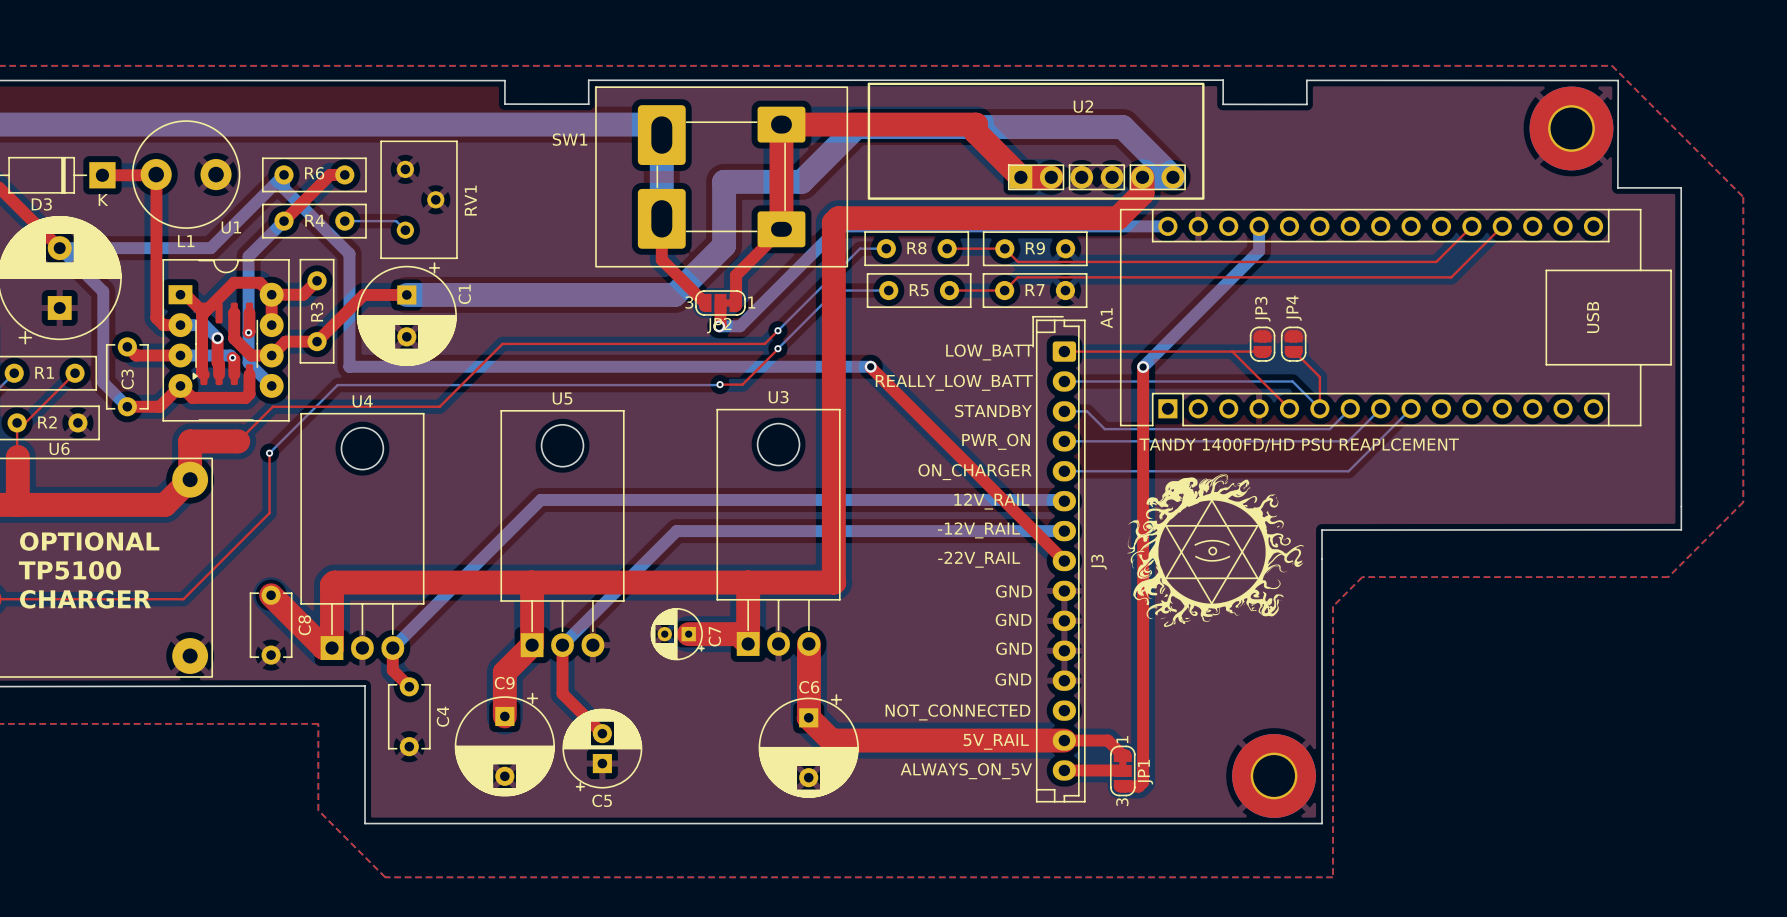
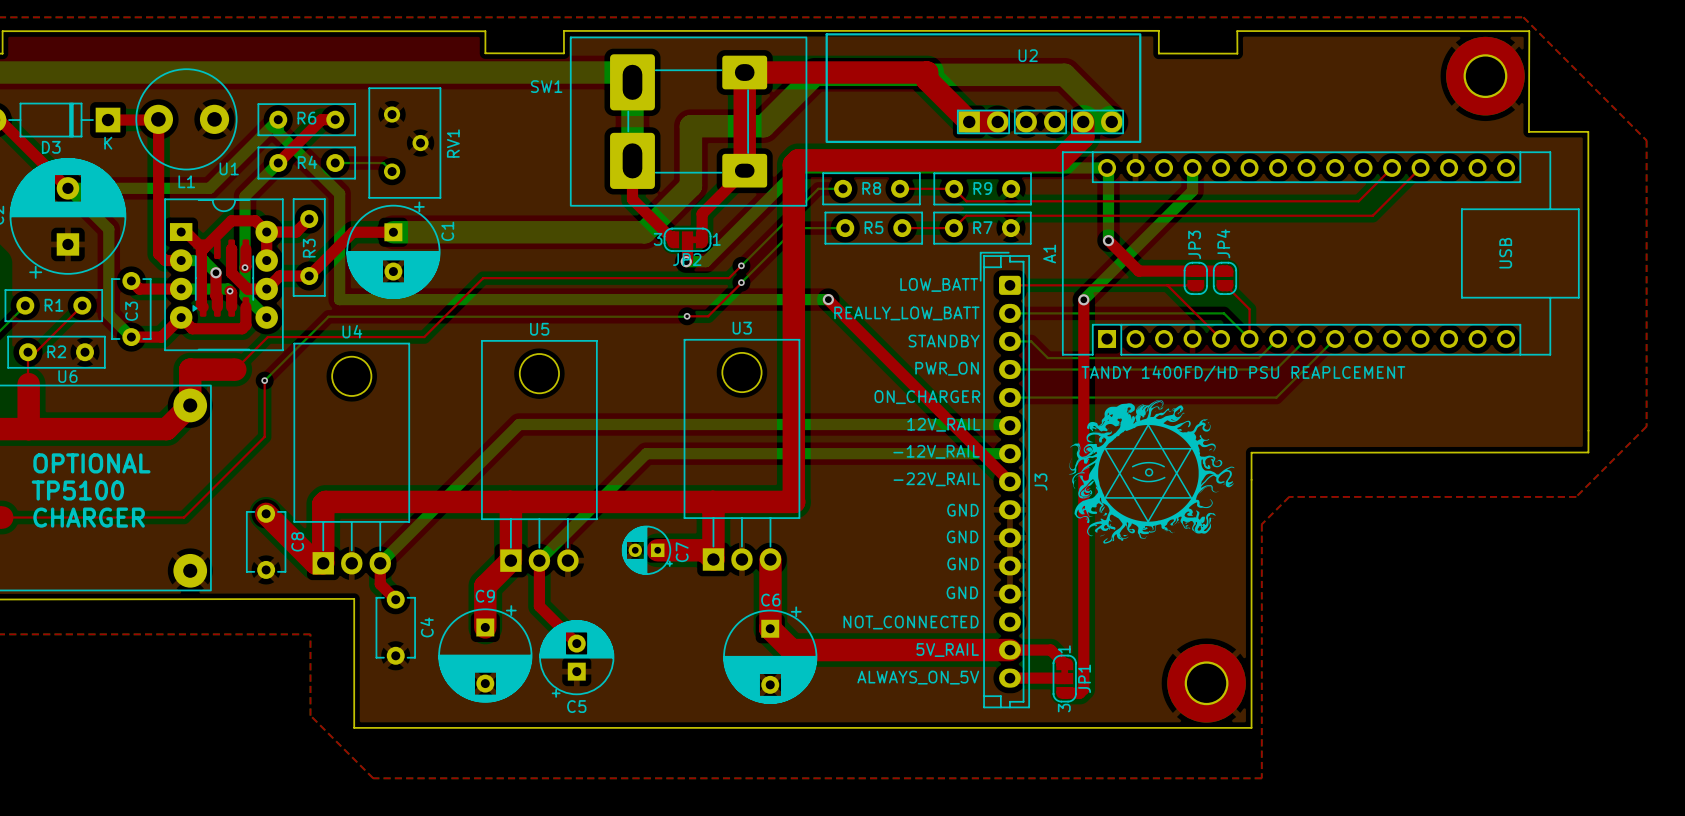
bottom track: none -> (1108, 169) (1108, 240)
top track: none -> (1108, 240) (1138, 271) (1224, 271)
via: none -> (1108, 240)

